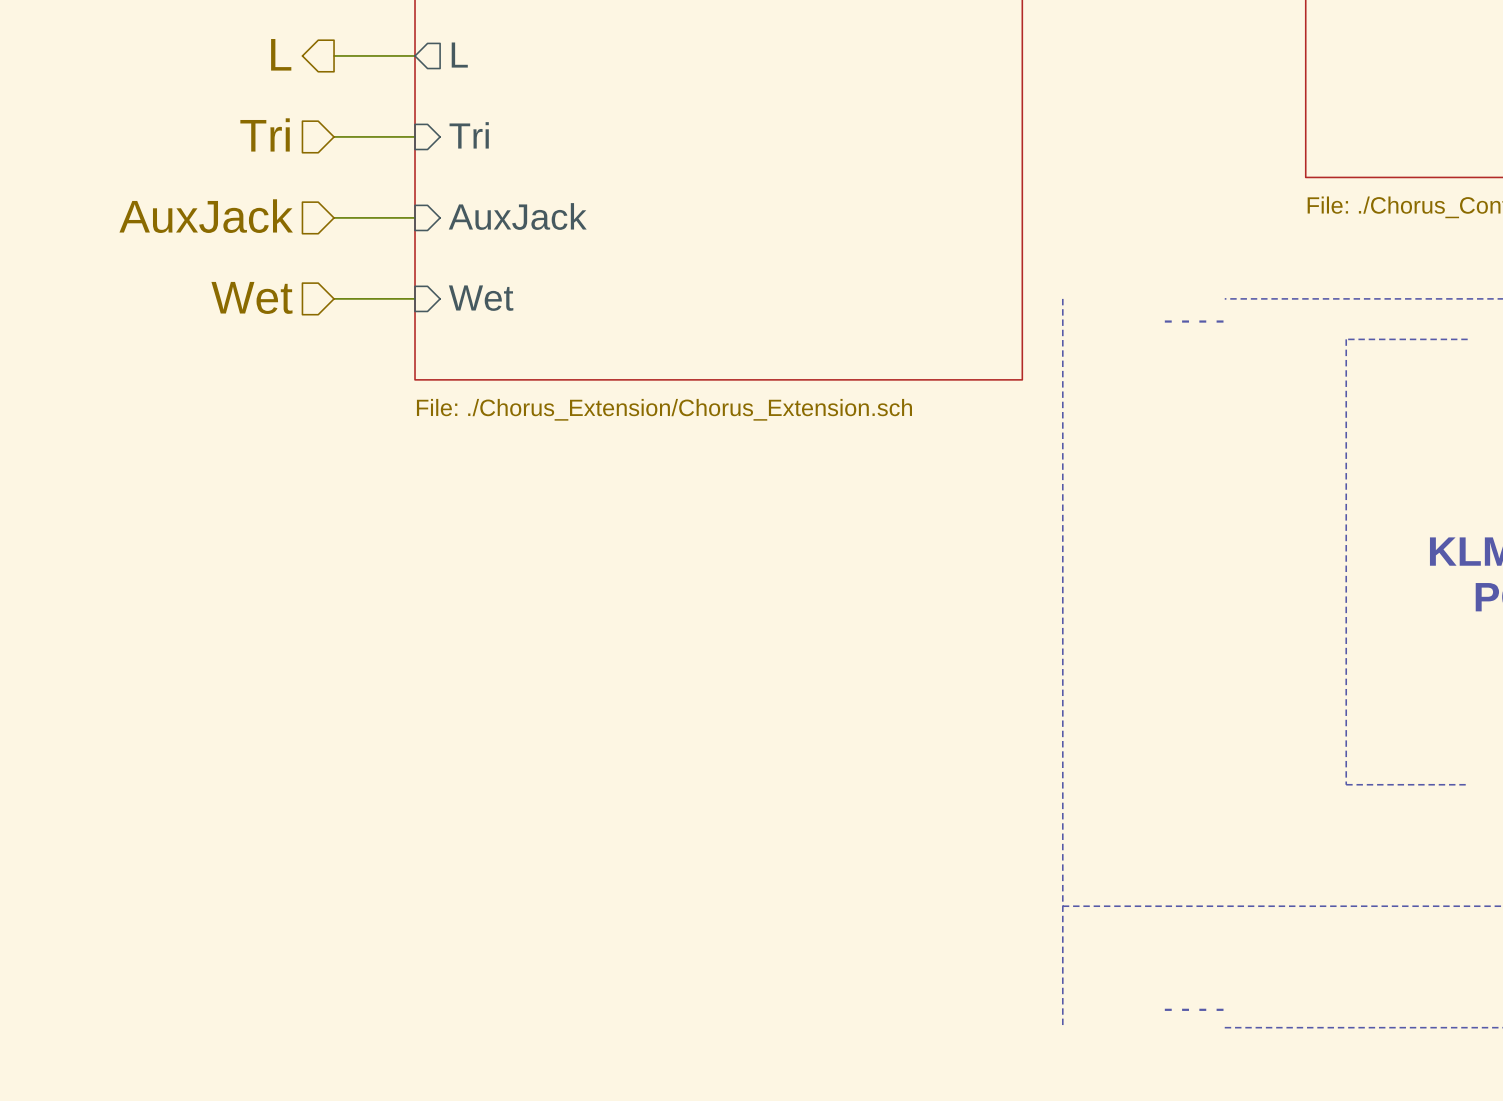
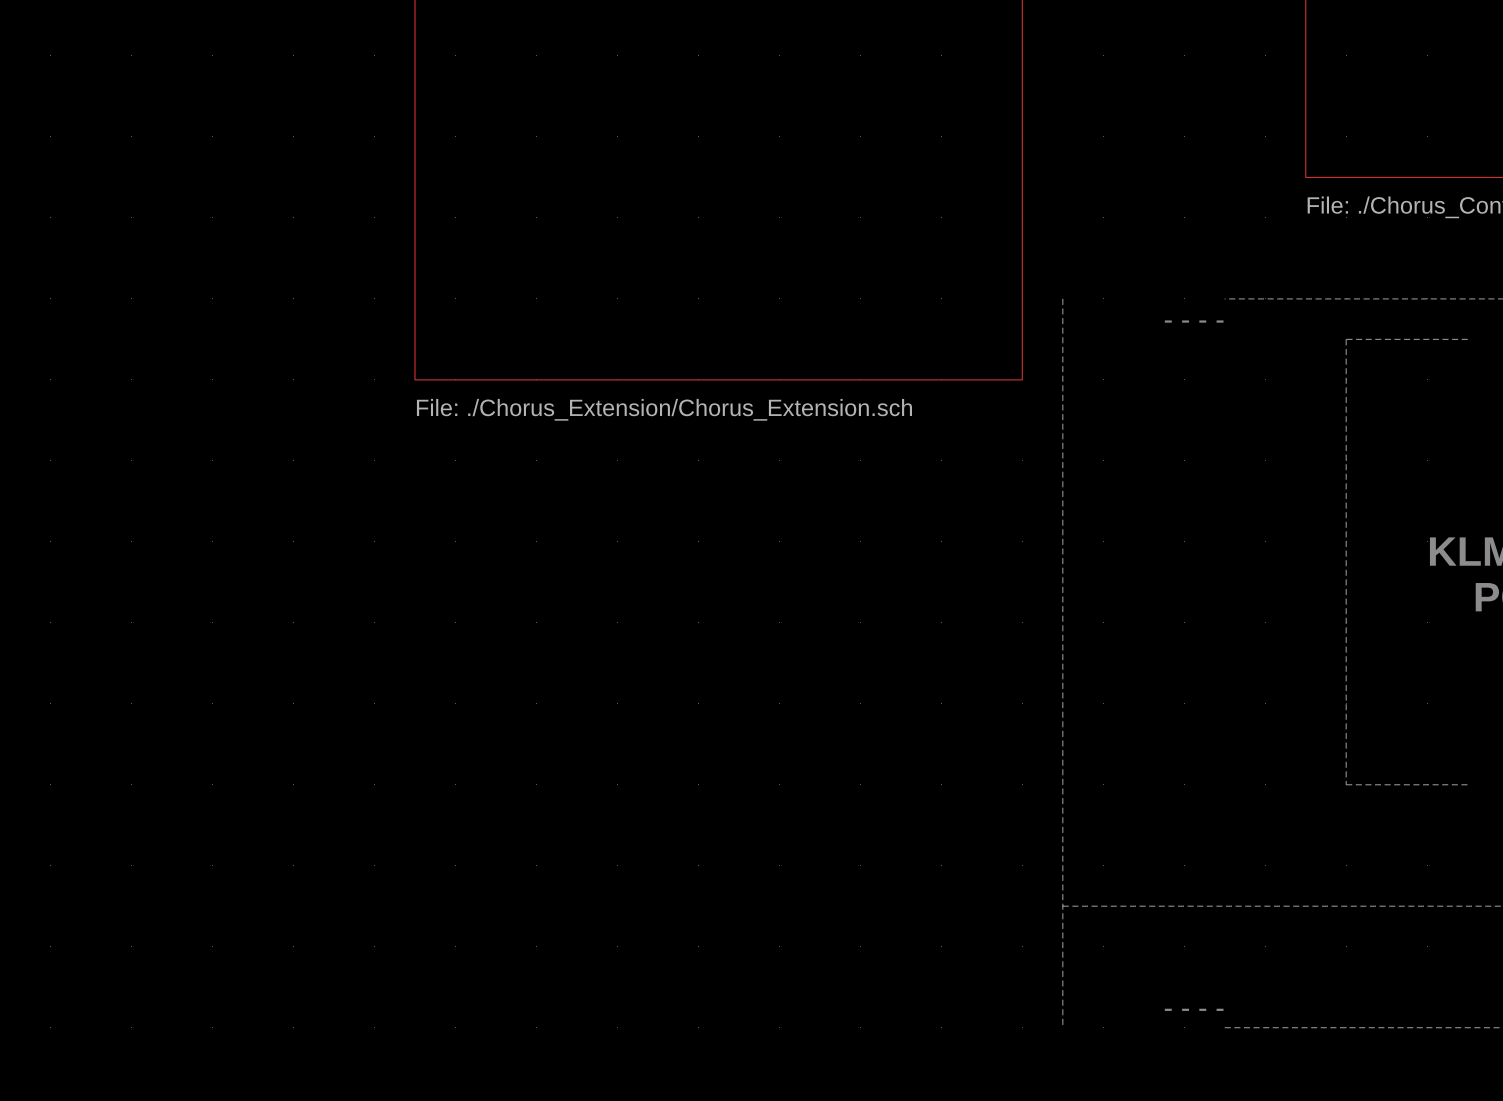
hierarchical label: L (281, 54) -> none
wire: (334, 55) (415, 55) -> none
sheet pin: L (459, 55) -> none
hierarchical label: Tri (265, 134) -> none
sheet pin: Tri (469, 135) -> none
wire: (334, 136) (415, 136) -> none
hierarchical label: AuxJack (206, 216) -> none
sheet pin: AuxJack (517, 216) -> none
wire: (334, 217) (415, 217) -> none
hierarchical label: Wet (251, 297) -> none
wire: (334, 298) (415, 298) -> none
sheet pin: Wet (481, 298) -> none

